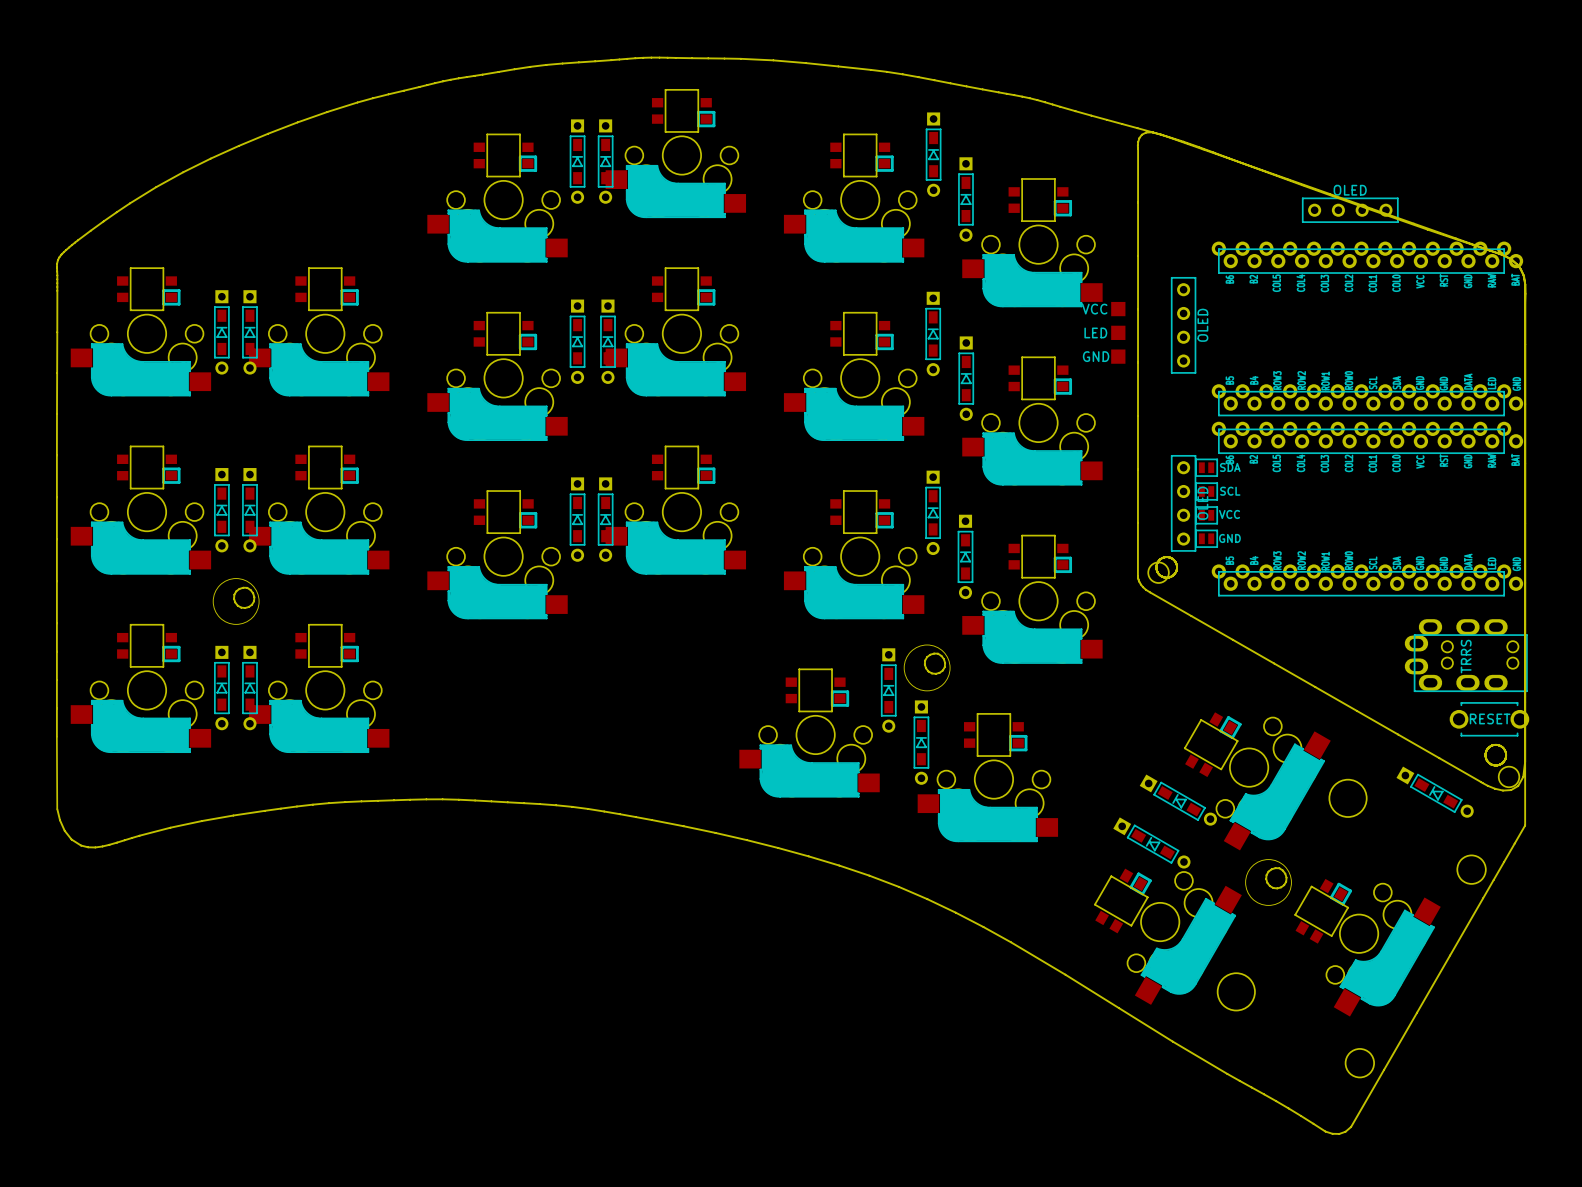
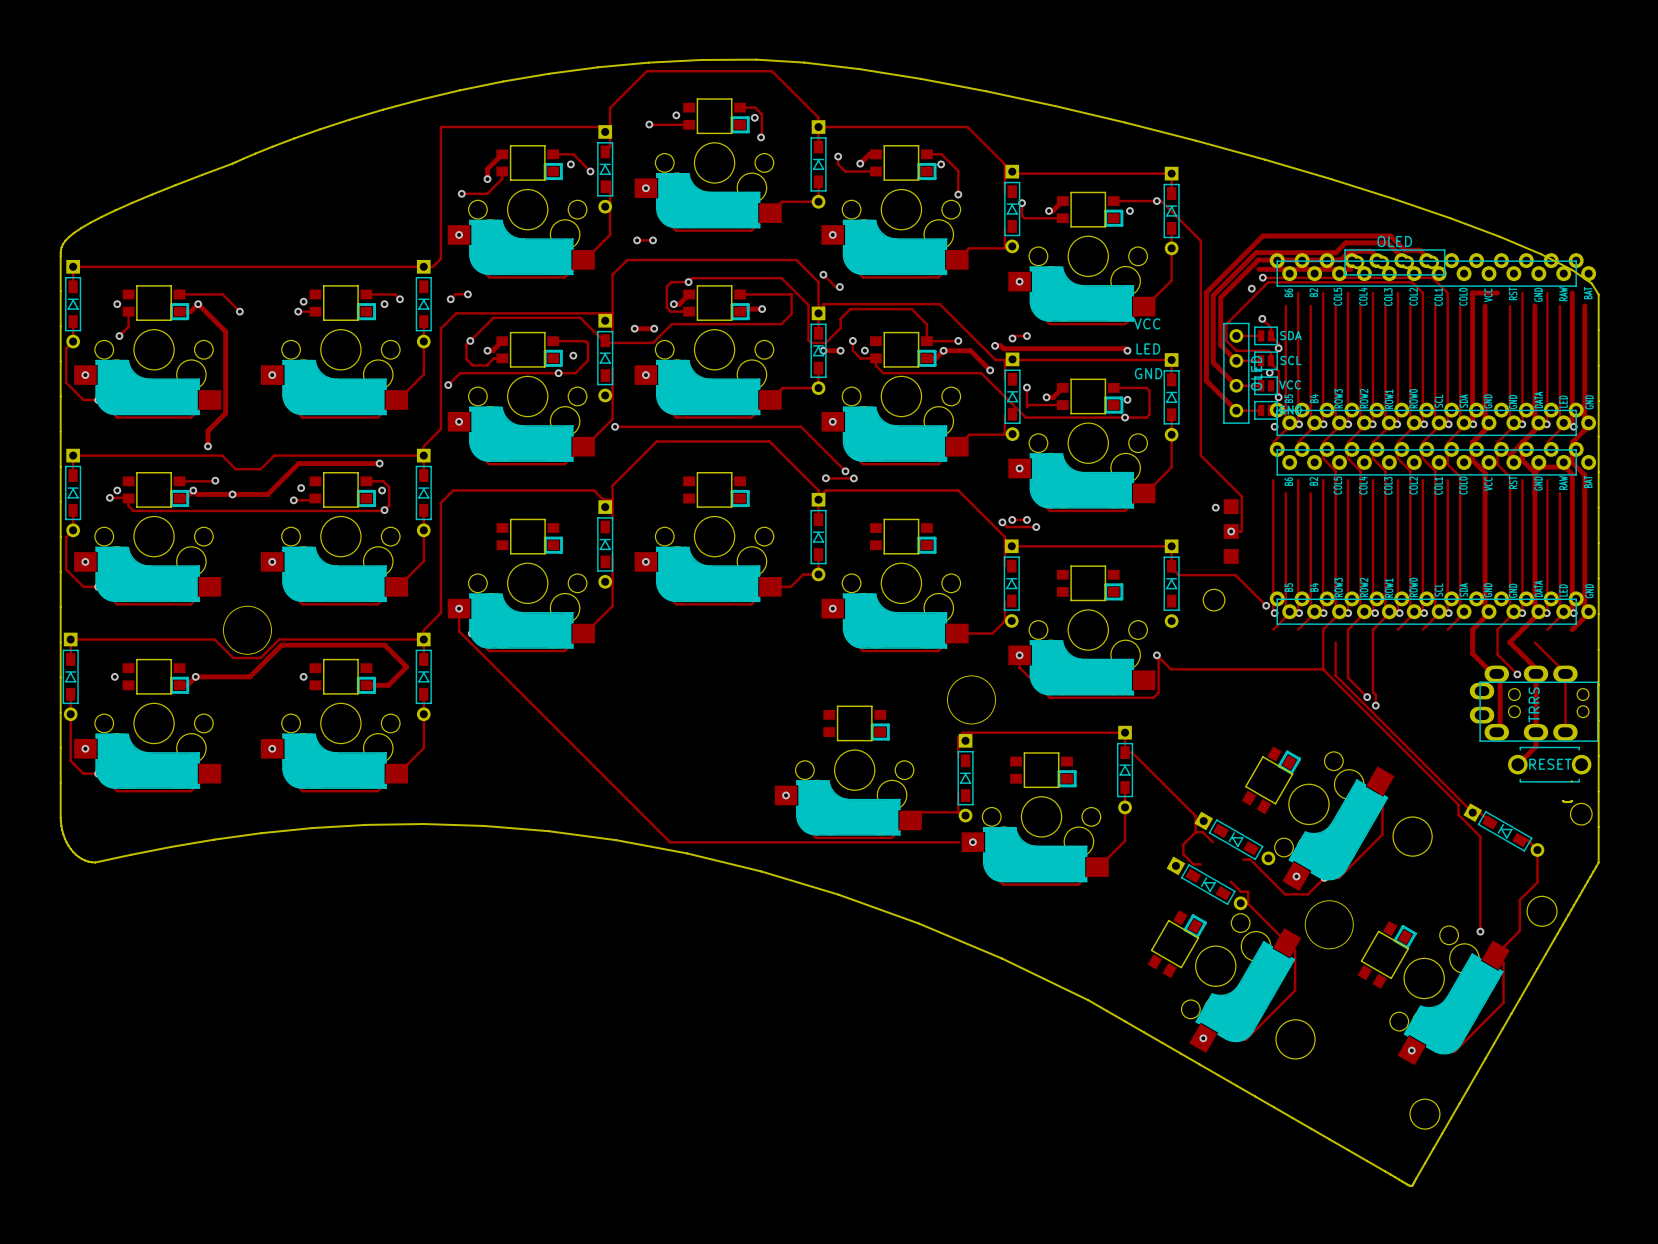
part footprint: [651, 89, 716, 133] -> [683, 98, 750, 135]
track: none -> (740, 107) (755, 107) (761, 114) (761, 137)
via: none -> (676, 115)
via: none -> (754, 117)
track: none -> (649, 124) (689, 124)
via: none -> (649, 124)
track: none -> (610, 127) (441, 127) (440, 258) (433, 266) (73, 266) (73, 286)
track: none -> (818, 127) (967, 127) (1004, 164) (1004, 193)
via: none -> (761, 137)
board edge: (1152, 132) (1502, 254) (1511, 259) (1521, 269) (1525, 284) (1525, 761) (1523, 776) (1518, 785) (1511, 790) (1494, 788) (1482, 783) (1150, 592) (1139, 581) (1137, 145) (1141, 134) (1152, 132) -> none
part footprint: [473, 133, 538, 178] -> [496, 145, 563, 181]
part footprint: [830, 133, 894, 178] -> [870, 145, 937, 181]
track: none -> (610, 146) (610, 108) (646, 71) (772, 71) (818, 117) (818, 146)
track: none -> (502, 154) (487, 169) (487, 179)
track: none -> (553, 154) (573, 154) (590, 171)
track: none -> (875, 154) (869, 154) (860, 163)
track: none -> (926, 154) (941, 154) (958, 171) (958, 194)
track: none -> (838, 156) (838, 164) (845, 171) (875, 171)
via: none -> (838, 156)
part: (933, 154) -> none
via: none -> (570, 164)
part: none -> (818, 164)
via: none -> (860, 163)
via: none -> (941, 164)
part: (605, 161) -> none
track: none -> (501, 171) (502, 178) (487, 193) (461, 193)
via: none -> (590, 171)
track: none -> (1004, 173) (1171, 173) (1171, 193)
via: none -> (487, 179)
track: none -> (610, 181) (610, 234) (564, 277) (489, 277) (471, 259)
track: none -> (818, 181) (818, 201) (781, 201) (751, 230) (676, 230) (658, 213)
part footprint: [1008, 178, 1073, 222] -> [1056, 191, 1124, 228]
via: none -> (645, 188)
via: none -> (461, 193)
via: none -> (958, 194)
track: none -> (1062, 201) (1052, 210) (1049, 210)
track: none -> (1113, 201) (1161, 201) (1200, 240) (1200, 455) (1241, 496) (1241, 530) (1231, 531)
via: none -> (1156, 201)
track: none -> (1022, 203) (1022, 215) (1024, 218) (1062, 218)
via: none -> (1022, 203)
via: none -> (1049, 210)
via: none -> (1129, 210)
part: none -> (1171, 210)
part position: (1350, 210) -> (1394, 262)
track: none -> (1004, 228) (1004, 248) (968, 248) (938, 277) (863, 277) (845, 259)
track: none -> (1171, 228) (1171, 280) (1125, 324) (1049, 324) (1032, 306)
via: none -> (459, 234)
via: none -> (832, 234)
track: none -> (637, 240) (653, 240)
via: none -> (637, 240)
via: none -> (653, 240)
track: none -> (1382, 262) (1371, 251) (1349, 251) (1340, 260) (1258, 260) (1220, 297) (1220, 345) (1236, 360) (1261, 360)
track: none -> (1407, 262) (1387, 242) (1345, 242) (1335, 252) (1256, 252) (1213, 295) (1213, 362) (1236, 385) (1261, 385)
track: none -> (1432, 262) (1419, 250) (1404, 250) (1390, 236) (1263, 236) (1206, 292) (1206, 380) (1236, 410) (1261, 410)
track: none -> (1258, 269) (1350, 269)
track: none -> (823, 274) (835, 287) (839, 287)
via: none -> (823, 274)
track: none -> (1262, 277) (1432, 277) (1447, 292) (1448, 424)
via: none -> (1262, 277)
part footprint: [117, 267, 181, 311] -> [122, 285, 190, 321]
part footprint: [295, 267, 359, 311] -> [309, 285, 377, 321]
part footprint: [651, 267, 716, 311] -> [683, 285, 750, 321]
via: none -> (1019, 281)
via: none -> (688, 282)
via: none -> (839, 287)
via: none -> (1251, 288)
track: none -> (1298, 292) (1299, 424)
track: none -> (1323, 292) (1323, 424)
track: none -> (1348, 292) (1348, 424)
track: none -> (1372, 292) (1372, 424)
track: none -> (1397, 292) (1397, 424)
track: none -> (1497, 292) (1472, 292) (1473, 424)
track: none -> (1522, 292) (1522, 424)
track: none -> (1547, 292) (1546, 424)
track: none -> (1572, 292) (1573, 426)
track: none -> (467, 294) (455, 294) (450, 299)
via: none -> (467, 294)
track: none -> (791, 294) (791, 313) (781, 324) (671, 324) (653, 342) (605, 342) (580, 317) (493, 317) (466, 344) (466, 359) (472, 365) (487, 365) (493, 358) (502, 358)
track: none -> (179, 294) (222, 294) (239, 311)
track: none -> (366, 294) (395, 294) (399, 299)
track: none -> (689, 294) (679, 304) (673, 304)
track: none -> (740, 294) (791, 294)
via: none -> (399, 299)
via: none -> (450, 299)
via: none -> (303, 301)
part: none -> (73, 304)
via: none -> (117, 304)
via: none -> (198, 304)
via: none -> (384, 304)
part: none -> (423, 304)
via: none -> (673, 304)
track: none -> (1285, 305) (1285, 430) (1273, 442)
track: none -> (1310, 305) (1310, 430) (1298, 442)
track: none -> (1335, 305) (1335, 430) (1323, 442) (1323, 458) (1335, 471) (1335, 617) (1323, 629) (1323, 669)
track: none -> (1360, 305) (1360, 430) (1348, 442) (1348, 458) (1360, 471) (1360, 617) (1348, 629) (1348, 677) (1367, 697)
track: none -> (1385, 305) (1385, 430) (1372, 442) (1372, 458) (1385, 471) (1385, 617) (1372, 629) (1372, 692) (1375, 695) (1375, 705)
track: none -> (1410, 305) (1410, 430) (1397, 442) (1397, 458) (1410, 471) (1410, 617) (1397, 629)
track: none -> (1435, 305) (1435, 430) (1422, 442) (1422, 458) (1435, 471) (1435, 617) (1422, 629)
track: none -> (1460, 305) (1460, 430) (1447, 442) (1447, 464) (1460, 476) (1460, 617) (1447, 629)
track: none -> (1485, 305) (1485, 430) (1472, 442) (1472, 460) (1485, 472) (1485, 617) (1472, 629) (1472, 653) (1492, 673) (1496, 673) (1500, 677) (1500, 728) (1496, 732)
track: none -> (1509, 305) (1509, 430) (1497, 442) (1497, 464) (1510, 476) (1510, 617) (1497, 629) (1497, 654) (1517, 674)
track: none -> (1534, 305) (1534, 430) (1522, 442) (1522, 460) (1534, 472)
track: none -> (1559, 305) (1559, 430) (1547, 442)
track: none -> (1584, 305) (1584, 430) (1572, 442) (1572, 462) (1584, 475) (1584, 617) (1572, 629)
track: none -> (762, 309) (742, 309) (740, 311)
via: none -> (762, 309)
track: none -> (128, 311) (128, 326) (119, 336)
track: none -> (179, 311) (190, 311) (198, 304) (225, 331) (225, 413) (207, 430) (207, 446)
via: none -> (239, 311)
track: none -> (298, 311) (315, 311)
via: none -> (298, 311)
track: none -> (689, 311) (670, 311) (666, 307) (666, 286) (671, 282) (688, 282) (692, 278) (781, 278) (808, 305) (808, 340) (811, 342) (825, 342) (840, 328) (840, 318) (850, 309) (911, 309) (926, 324) (926, 341) (958, 340)
track: none -> (612, 313) (456, 313) (440, 328) (440, 429) (423, 446) (423, 475)
track: none -> (818, 313) (823, 308) (823, 304) (939, 304) (995, 359) (1171, 359) (1171, 379)
track: none -> (1262, 318) (1270, 327) (1270, 335) (1278, 343) (1278, 348)
via: none -> (1262, 318)
track: none -> (73, 321) (73, 341) (66, 348) (66, 382) (83, 399) (99, 399) (117, 417) (190, 417) (209, 399)
track: none -> (423, 321) (423, 374) (377, 417) (302, 417) (284, 399)
part footprint: [473, 312, 538, 356] -> [496, 331, 563, 368]
part footprint: [830, 312, 894, 356] -> [870, 331, 937, 368]
track: none -> (634, 328) (654, 328)
via: none -> (634, 328)
via: none -> (654, 328)
track: none -> (612, 333) (612, 274) (627, 260) (796, 260) (818, 282) (818, 333)
via: none -> (119, 336)
track: none -> (1026, 336) (1014, 336) (1012, 338)
via: none -> (1026, 336)
track: none -> (1236, 335) (1261, 335)
via: none -> (1012, 338)
via: none -> (470, 340)
track: none -> (502, 341) (492, 350) (487, 350)
track: none -> (553, 341) (585, 341) (588, 343) (588, 360) (575, 373) (460, 373) (448, 385)
track: none -> (852, 340) (852, 350) (860, 358) (875, 358) (875, 365) (883, 373) (981, 373) (1025, 417) (1146, 417) (1149, 414) (1149, 390) (1146, 387) (1113, 387)
via: none -> (852, 340)
via: none -> (958, 340)
part position: (1183, 325) -> (1236, 373)
track: none -> (995, 345) (1000, 345) (1003, 348) (1125, 348) (1127, 350)
via: none -> (995, 345)
part: (221, 332) -> none
part: (249, 332) -> none
part position: (1118, 332) -> (1231, 531)
via: none -> (1278, 348)
part: (933, 333) -> none
via: none -> (487, 350)
part: none -> (818, 350)
track: none -> (823, 350) (840, 350)
via: none -> (823, 350)
via: none -> (840, 350)
via: none -> (864, 350)
via: none -> (943, 350)
via: none -> (1127, 350)
via: none -> (573, 355)
part: (607, 341) -> none
track: none -> (926, 358) (935, 358) (943, 350) (970, 350) (990, 370)
track: none -> (1004, 359) (1004, 379)
track: none -> (612, 368) (612, 419) (564, 464) (489, 464) (471, 446)
track: none -> (818, 368) (818, 388) (782, 388) (751, 417) (676, 417) (658, 399)
via: none -> (990, 370)
via: none -> (1269, 372)
via: none -> (558, 373)
part footprint: [1008, 356, 1073, 401] -> [1056, 378, 1124, 415]
via: none -> (85, 375)
via: none -> (272, 375)
via: none -> (645, 375)
via: none -> (448, 385)
track: none -> (1026, 387) (1026, 407) (1029, 405) (1062, 405)
via: none -> (1026, 387)
track: none -> (1062, 387) (1053, 397) (1046, 397)
via: none -> (1046, 397)
part: none -> (1171, 397)
track: none -> (1278, 397) (1278, 371) (1270, 363) (1270, 352) (1269, 350) (1236, 350) (1226, 340) (1226, 324) (1268, 282) (1412, 282) (1422, 292) (1424, 424)
via: none -> (1278, 397)
via: none -> (98, 399)
via: none -> (1127, 399)
track: none -> (1004, 414) (1004, 434) (969, 434) (938, 464) (863, 464) (845, 446)
track: none -> (1171, 414) (1171, 467) (1125, 510) (1049, 510) (1032, 493)
via: none -> (1125, 417)
via: none -> (459, 421)
via: none -> (832, 421)
via: none -> (1299, 424)
via: none -> (1323, 424)
via: none -> (1348, 424)
via: none -> (1372, 424)
via: none -> (1397, 424)
via: none -> (1424, 424)
via: none -> (1448, 424)
via: none -> (1473, 424)
via: none -> (1522, 424)
via: none -> (1546, 424)
track: none -> (615, 426) (801, 426) (845, 471)
via: none -> (615, 426)
via: none -> (1274, 426)
via: none -> (1573, 426)
track: none -> (1522, 442) (1509, 455)
via: none -> (207, 446)
track: none -> (423, 455) (274, 455) (260, 469) (235, 469) (222, 455) (73, 455) (73, 475)
track: none -> (379, 463) (298, 463) (267, 494) (197, 494) (193, 490) (185, 498) (179, 498)
via: none -> (379, 463)
part footprint: [117, 445, 181, 490] -> [122, 472, 190, 508]
part footprint: [295, 445, 359, 490] -> [309, 472, 377, 508]
part footprint: [651, 445, 716, 490] -> [683, 472, 750, 508]
via: none -> (1019, 468)
via: none -> (845, 471)
track: none -> (1534, 472) (1534, 617) (1510, 642) (1536, 668) (1536, 746) (1517, 764)
track: none -> (1534, 472) (1540, 467) (1565, 467) (1572, 474) (1573, 613)
track: none -> (825, 478) (853, 478)
via: none -> (825, 478)
via: none -> (853, 478)
track: none -> (215, 480) (179, 481)
via: none -> (215, 480)
track: none -> (1273, 480) (1274, 613)
track: none -> (1298, 480) (1299, 613)
track: none -> (1323, 480) (1323, 613)
track: none -> (1348, 480) (1348, 613)
track: none -> (1372, 480) (1372, 610) (1375, 613)
track: none -> (1397, 480) (1397, 611) (1399, 613)
track: none -> (1422, 480) (1424, 613)
track: none -> (1447, 480) (1448, 613)
track: none -> (1522, 480) (1522, 613)
track: none -> (1547, 480) (1546, 613)
track: none -> (366, 481) (383, 481) (389, 487) (389, 505) (383, 510) (133, 510) (128, 505) (127, 497) (109, 497)
via: none -> (301, 488)
part position: (1206, 467) -> (1266, 335)
via: none -> (117, 490)
via: none -> (193, 490)
via: none -> (382, 490)
part: none -> (73, 492)
part: none -> (423, 492)
track: none -> (1285, 493) (1285, 617) (1273, 629)
track: none -> (1310, 493) (1310, 617) (1298, 629)
track: none -> (1559, 493) (1559, 617) (1547, 629)
via: none -> (232, 494)
via: none -> (109, 497)
track: none -> (315, 498) (313, 500) (293, 500)
track: none -> (818, 497) (825, 490) (958, 490) (1004, 537) (1004, 566)
track: none -> (612, 499) (603, 499) (594, 490) (453, 490) (440, 502) (440, 613) (423, 630) (423, 659)
via: none -> (293, 500)
via: none -> (1215, 507)
via: none -> (384, 510)
track: none -> (73, 510) (73, 530) (66, 537) (66, 569) (83, 586) (99, 586) (117, 604) (190, 604) (209, 586)
track: none -> (423, 510) (423, 561) (377, 604) (302, 604) (284, 586)
part footprint: [473, 490, 538, 534] -> [496, 518, 564, 555]
part footprint: [830, 490, 894, 534] -> [870, 518, 937, 555]
part position: (1206, 491) -> (1266, 360)
track: none -> (612, 519) (612, 485) (656, 441) (769, 441) (818, 490) (818, 519)
track: none -> (1012, 519) (1026, 519)
via: none -> (1012, 519)
via: none -> (1026, 519)
track: none -> (1002, 522) (1007, 527) (1036, 527)
via: none -> (1002, 522)
via: none -> (1036, 527)
part: (1183, 503) -> none
via: none -> (1231, 531)
part: (221, 510) -> none
part: (249, 510) -> none
part: none -> (818, 537)
part: (933, 512) -> none
part position: (1206, 515) -> (1266, 385)
part: (605, 519) -> none
track: none -> (1004, 546) (1171, 546) (1171, 568) (1178, 575) (1235, 575) (1266, 605)
track: none -> (612, 554) (612, 606) (564, 651) (489, 651) (471, 633)
track: none -> (818, 554) (818, 574) (803, 574) (790, 586) (769, 586) (751, 604) (676, 604) (658, 586)
part footprint: [1008, 534, 1073, 579] -> [1056, 565, 1124, 602]
via: none -> (85, 561)
via: none -> (272, 561)
via: none -> (645, 561)
part position: (1206, 538) -> (1266, 410)
part: none -> (1171, 583)
board edge: (1162, 557) (1157, 562) (1156, 570) -> none
board edge: (1163, 557) (1170, 557) -> none
board edge: (1171, 558) (1176, 563) (1176, 570) -> none
via: none -> (98, 586)
board edge: (1176, 571) (1171, 576) -> none
board edge: (1157, 572) (1161, 576) -> none
track: none -> (1004, 601) (1004, 621) (992, 633) (955, 633) (938, 651) (863, 651) (845, 633)
board edge: (1170, 576) (1163, 577) -> none
via: none -> (1266, 605)
track: none -> (459, 608) (459, 631) (670, 842) (959, 842)
via: none -> (459, 608)
via: none -> (832, 608)
via: none -> (1274, 613)
via: none -> (1299, 613)
via: none -> (1323, 613)
via: none -> (1348, 613)
via: none -> (1375, 613)
via: none -> (1399, 613)
via: none -> (1424, 613)
via: none -> (1448, 613)
via: none -> (1522, 613)
via: none -> (1546, 613)
via: none -> (1573, 613)
board edge: (243, 587) (250, 590) (254, 597) (252, 604) (245, 608) (237, 605) (234, 598) (236, 591) (243, 587) -> none
via: none -> (471, 633)
track: none -> (423, 639) (279, 639) (260, 657) (233, 657) (214, 639) (70, 639) (70, 659)
track: none -> (1335, 642) (1335, 675) (1472, 812) (1480, 812) (1490, 822)
track: none -> (1534, 642) (1565, 673) (1565, 732)
part footprint: [117, 624, 181, 668] -> [122, 658, 190, 695]
part footprint: [295, 624, 359, 668] -> [309, 658, 377, 695]
track: none -> (1019, 655) (1019, 667) (1049, 697) (1153, 697) (1158, 692) (1158, 655) (1156, 655) (1170, 669) (1323, 669)
via: none -> (1019, 655)
via: none -> (1156, 655)
track: none -> (1323, 669) (1458, 804) (1458, 814) (1480, 836) (1480, 931)
via: none -> (1517, 674)
part: none -> (70, 676)
via: none -> (114, 676)
via: none -> (195, 676)
via: none -> (303, 676)
part: none -> (423, 676)
board edge: (934, 653) (941, 655) (945, 663) (942, 670) (935, 673) (928, 671) (924, 664) (927, 657) (934, 653) -> none
track: none -> (179, 685) (187, 685) (195, 676) (249, 676) (281, 645) (384, 645) (406, 667) (388, 685) (366, 685)
part position: (1466, 655) -> (1534, 703)
track: none -> (70, 694) (70, 760) (83, 773) (99, 773) (117, 791) (190, 791) (209, 773)
track: none -> (423, 694) (423, 748) (377, 791) (302, 791) (284, 773)
via: none -> (1367, 697)
part footprint: [785, 668, 850, 713] -> [823, 705, 890, 742]
via: none -> (1375, 705)
part: (221, 688) -> none
part: (249, 688) -> none
part: (888, 690) -> none
part footprint: [1184, 712, 1242, 778] -> [1241, 746, 1302, 815]
part footprint: [963, 713, 1028, 757] -> [1010, 752, 1077, 789]
via: none -> (85, 748)
via: none -> (272, 748)
part position: (1489, 719) -> (1549, 764)
track: none -> (958, 757) (958, 737) (963, 732) (1125, 732) (1125, 752) (1132, 752) (1195, 816) (1195, 832)
part: none -> (1125, 770)
board edge: (56, 736) (57, 259) (69, 247) (103, 221) (156, 187) (183, 172) (238, 145) (327, 111) (372, 98) (458, 78) (546, 64) (635, 58) (773, 60) (886, 71) (1029, 98) (1183, 141) (1505, 256) (1519, 266) (1523, 275) (1525, 293) (1525, 825) (1351, 1126) (1345, 1131) (1339, 1133) (1325, 1131) (1172, 1041) (1010, 942) (955, 912) (869, 875) (808, 856) (746, 840) (652, 820) (572, 806) (426, 799) (329, 803) (264, 810) (201, 821) (102, 846) (88, 847) (71, 839) (64, 830) (57, 809) -> none
board edge: (56, 736) (57, 809) -> none
via: none -> (98, 773)
track: none -> (1380, 781) (1382, 834) (1339, 877) (1324, 877) (1308, 894) (1285, 894) (1250, 859) (1243, 859)
board edge: (1491, 745) (1486, 750) (1485, 758) -> none
board edge: (1492, 745) (1498, 745) -> none
board edge: (1500, 745) (1504, 750) -> none
board edge: (1504, 750) (1505, 758) -> none
track: none -> (1125, 787) (1125, 840) (1078, 884) (1003, 884) (985, 867)
track: none -> (958, 792) (958, 812) (918, 812) (891, 837) (816, 837) (798, 820)
via: none -> (786, 795)
board edge: (1505, 759) (1500, 764) -> none
board edge: (1486, 760) (1491, 764) -> none
board edge: none -> (60, 817) (61, 247) (74, 232) (115, 210) (320, 129) (383, 109) (460, 90) (549, 73) (597, 67) (701, 59) (756, 59) (859, 69) (920, 78) (1055, 106) (1195, 140) (1331, 179) (1450, 218) (1540, 254) (1572, 269) (1591, 283) (1598, 294) (1598, 862) (1411, 1185) (1088, 1000) (1001, 958) (918, 923) (838, 894) (761, 871) (687, 853) (616, 840) (548, 831) (484, 825) (423, 824) (366, 824) (261, 833) (170, 846) (91, 862) (81, 858) (70, 849) (63, 834) (60, 818)
track: none -> (1195, 832) (1202, 832) (1212, 842)
track: none -> (1195, 832) (1183, 844) (1183, 854) (1193, 864) (1200, 864)
track: none -> (1520, 840) (1527, 840) (1537, 850) (1537, 882) (1519, 900) (1519, 930) (1495, 955) (1503, 963) (1503, 1002) (1454, 1051) (1439, 1051)
via: none -> (972, 842)
via: none -> (1296, 876)
via: none -> (1324, 877)
track: none -> (1230, 881) (1240, 891) (1248, 891) (1248, 903) (1295, 950) (1295, 990) (1245, 1039) (1231, 1039)
part footprint: [1094, 868, 1152, 934] -> [1147, 910, 1207, 979]
board edge: (1275, 868) (1282, 870) (1286, 877) (1284, 885) (1277, 888) (1269, 886) (1266, 879) (1268, 871) (1275, 868) -> none
part footprint: [1294, 878, 1353, 944] -> [1357, 921, 1417, 989]
via: none -> (1480, 931)
via: none -> (1203, 1038)
via: none -> (1411, 1050)

